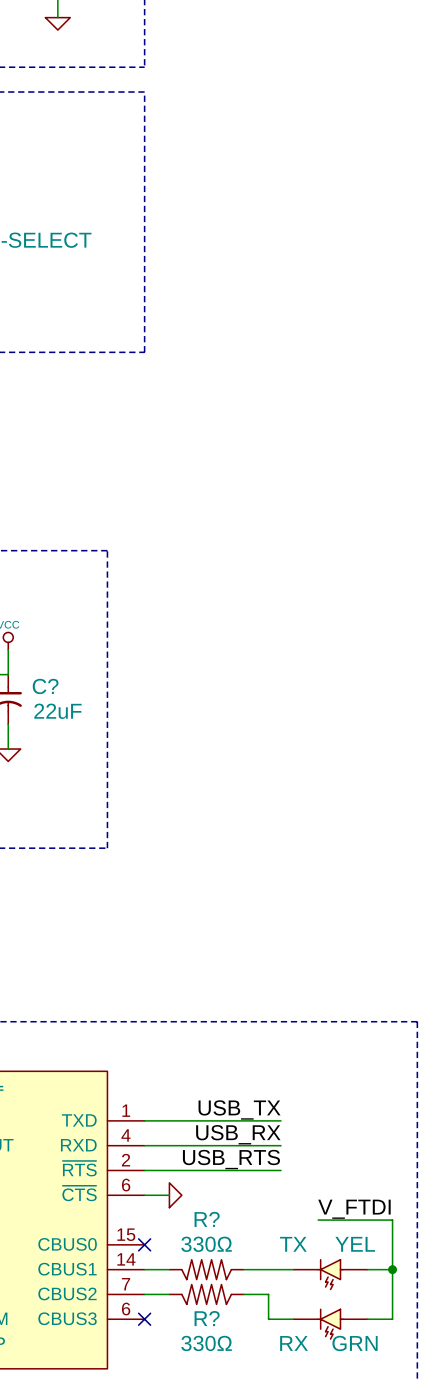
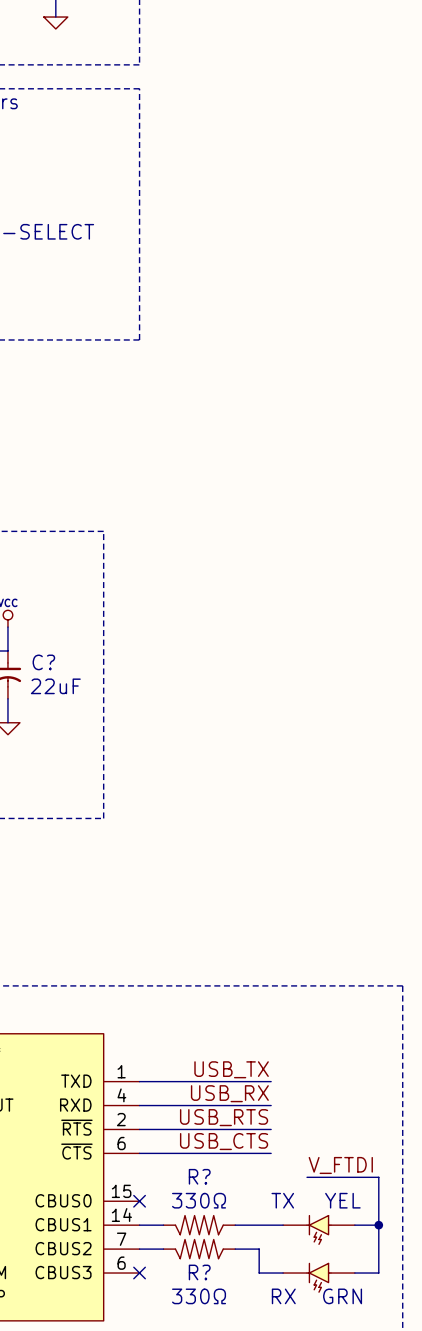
label: none -> USB_CTS (224, 1141)
wire: none -> (163, 1153) (271, 1153)
power symbol: (175, 1195) -> none

